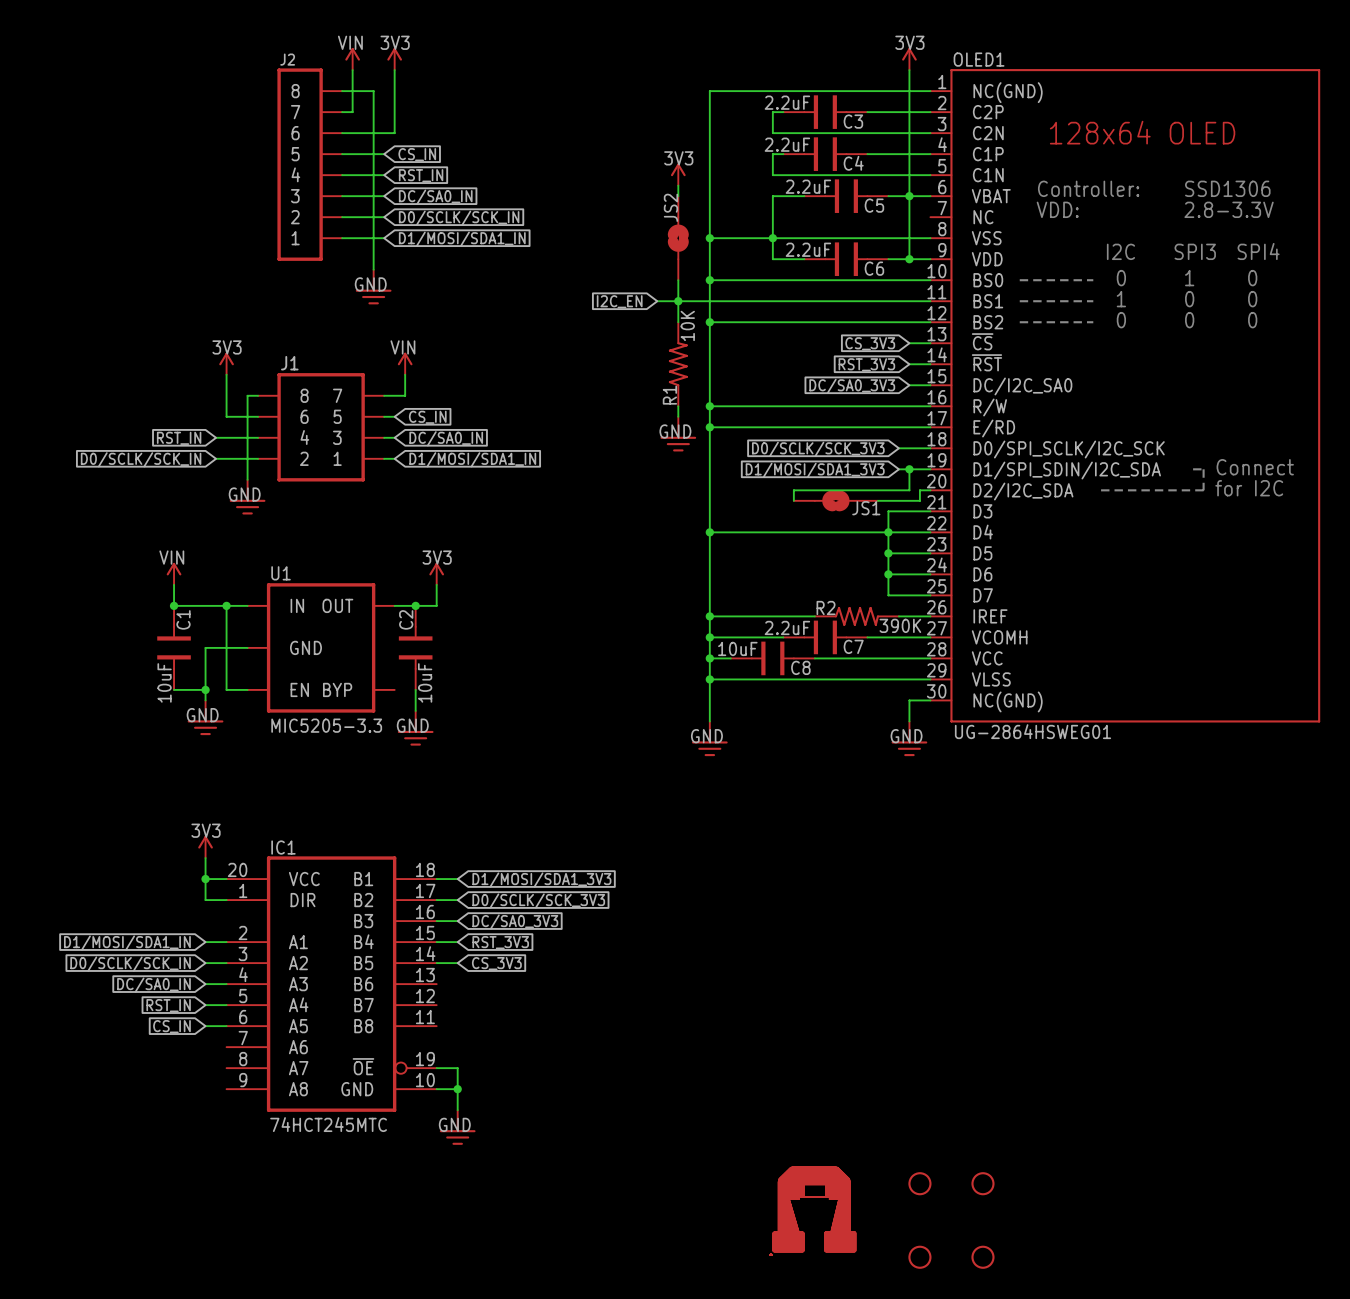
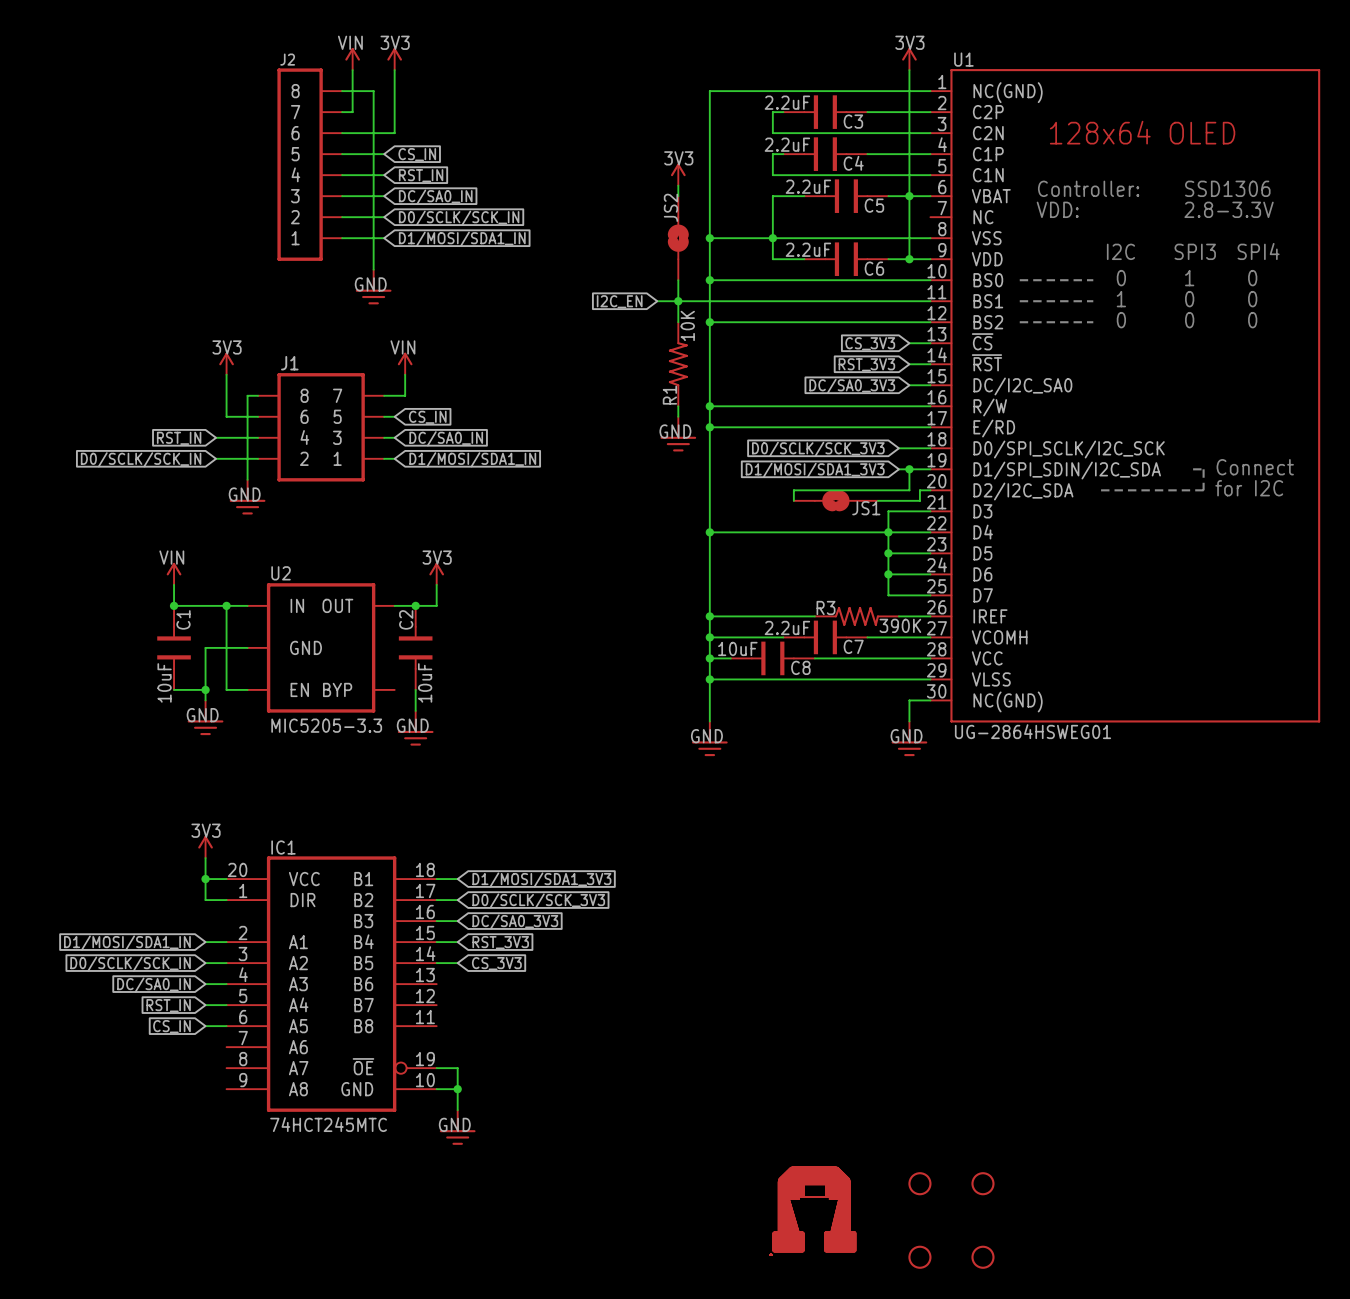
OLED1 name: OLED1 (979, 59) -> U1 (963, 59)
U1 name: U1 (281, 573) -> U2 (281, 573)
R2 name: R2 (826, 608) -> R3 (826, 608)

